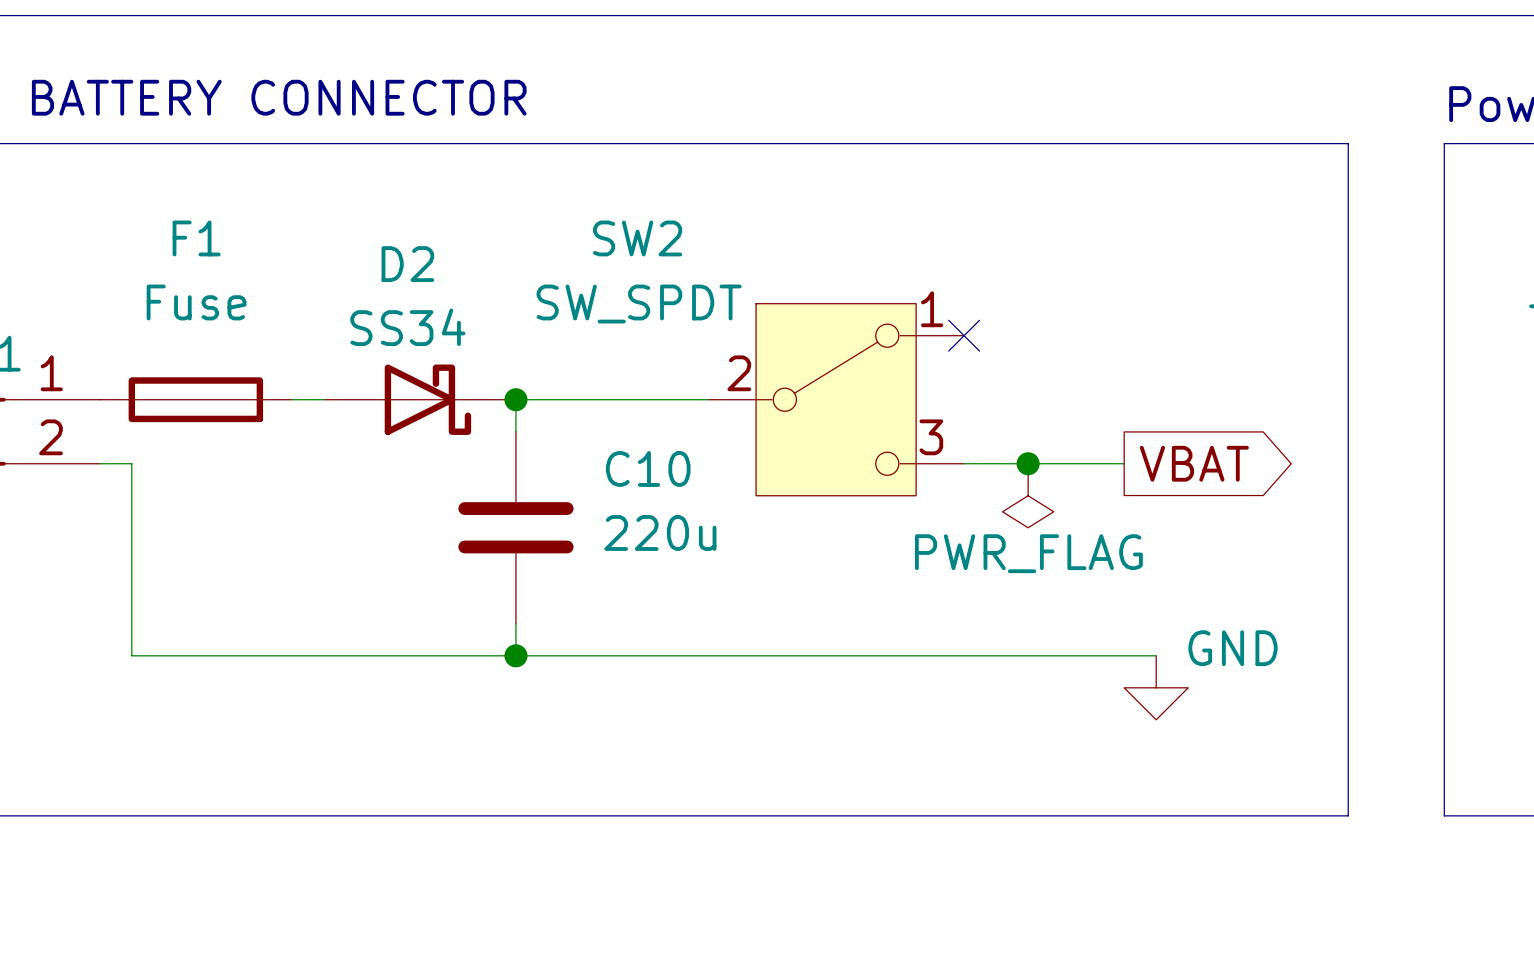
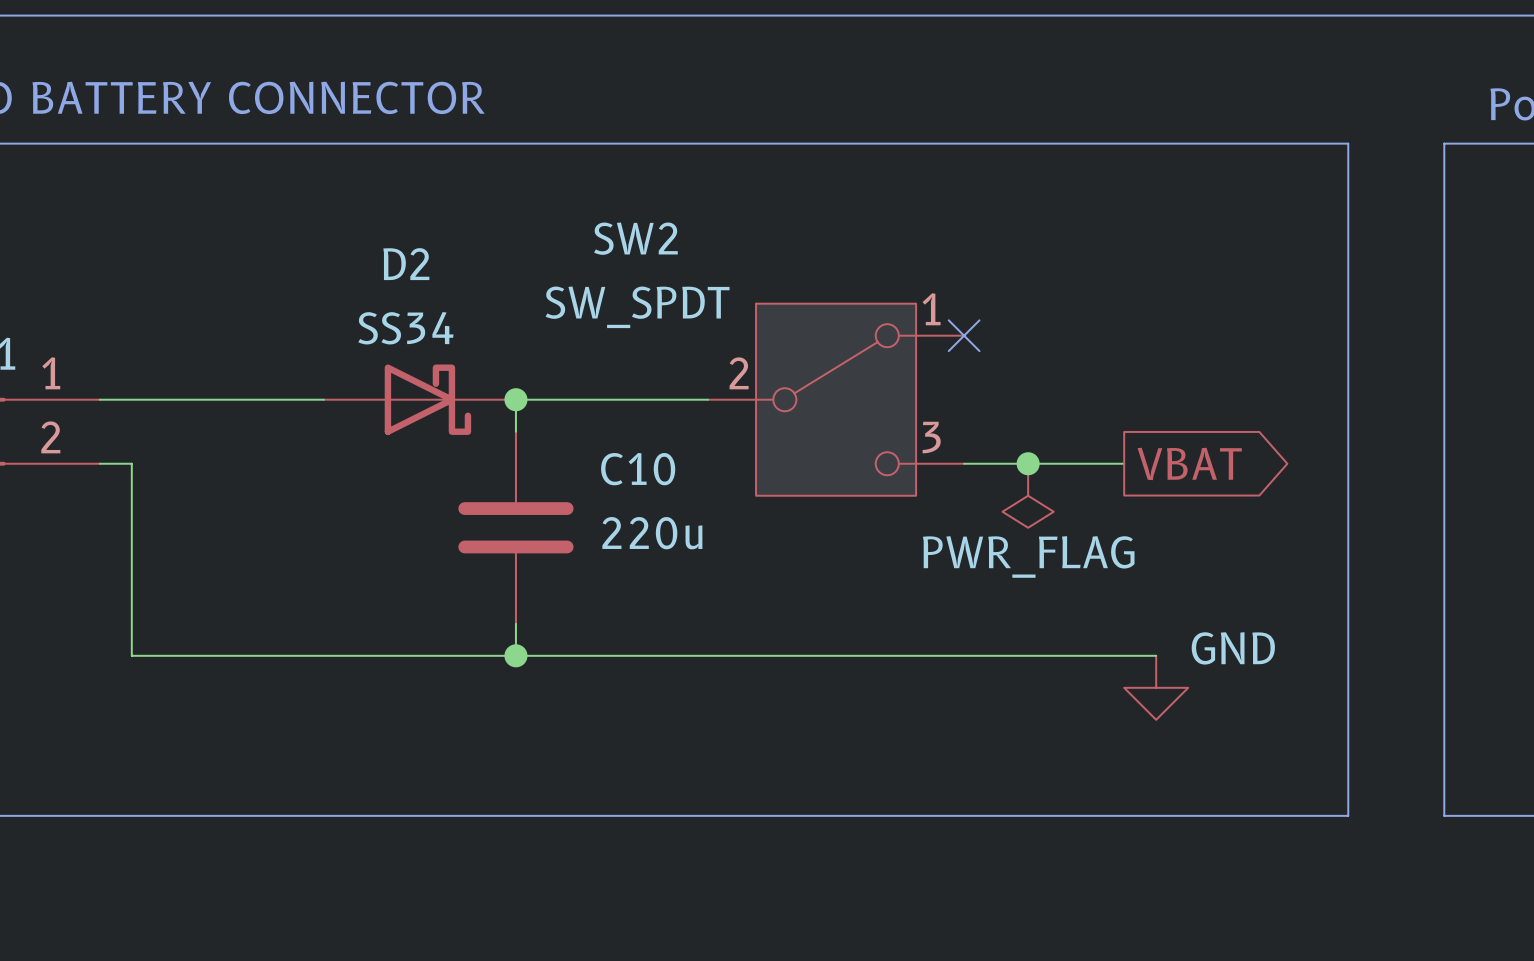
F1: Fuse (195, 399) -> none

